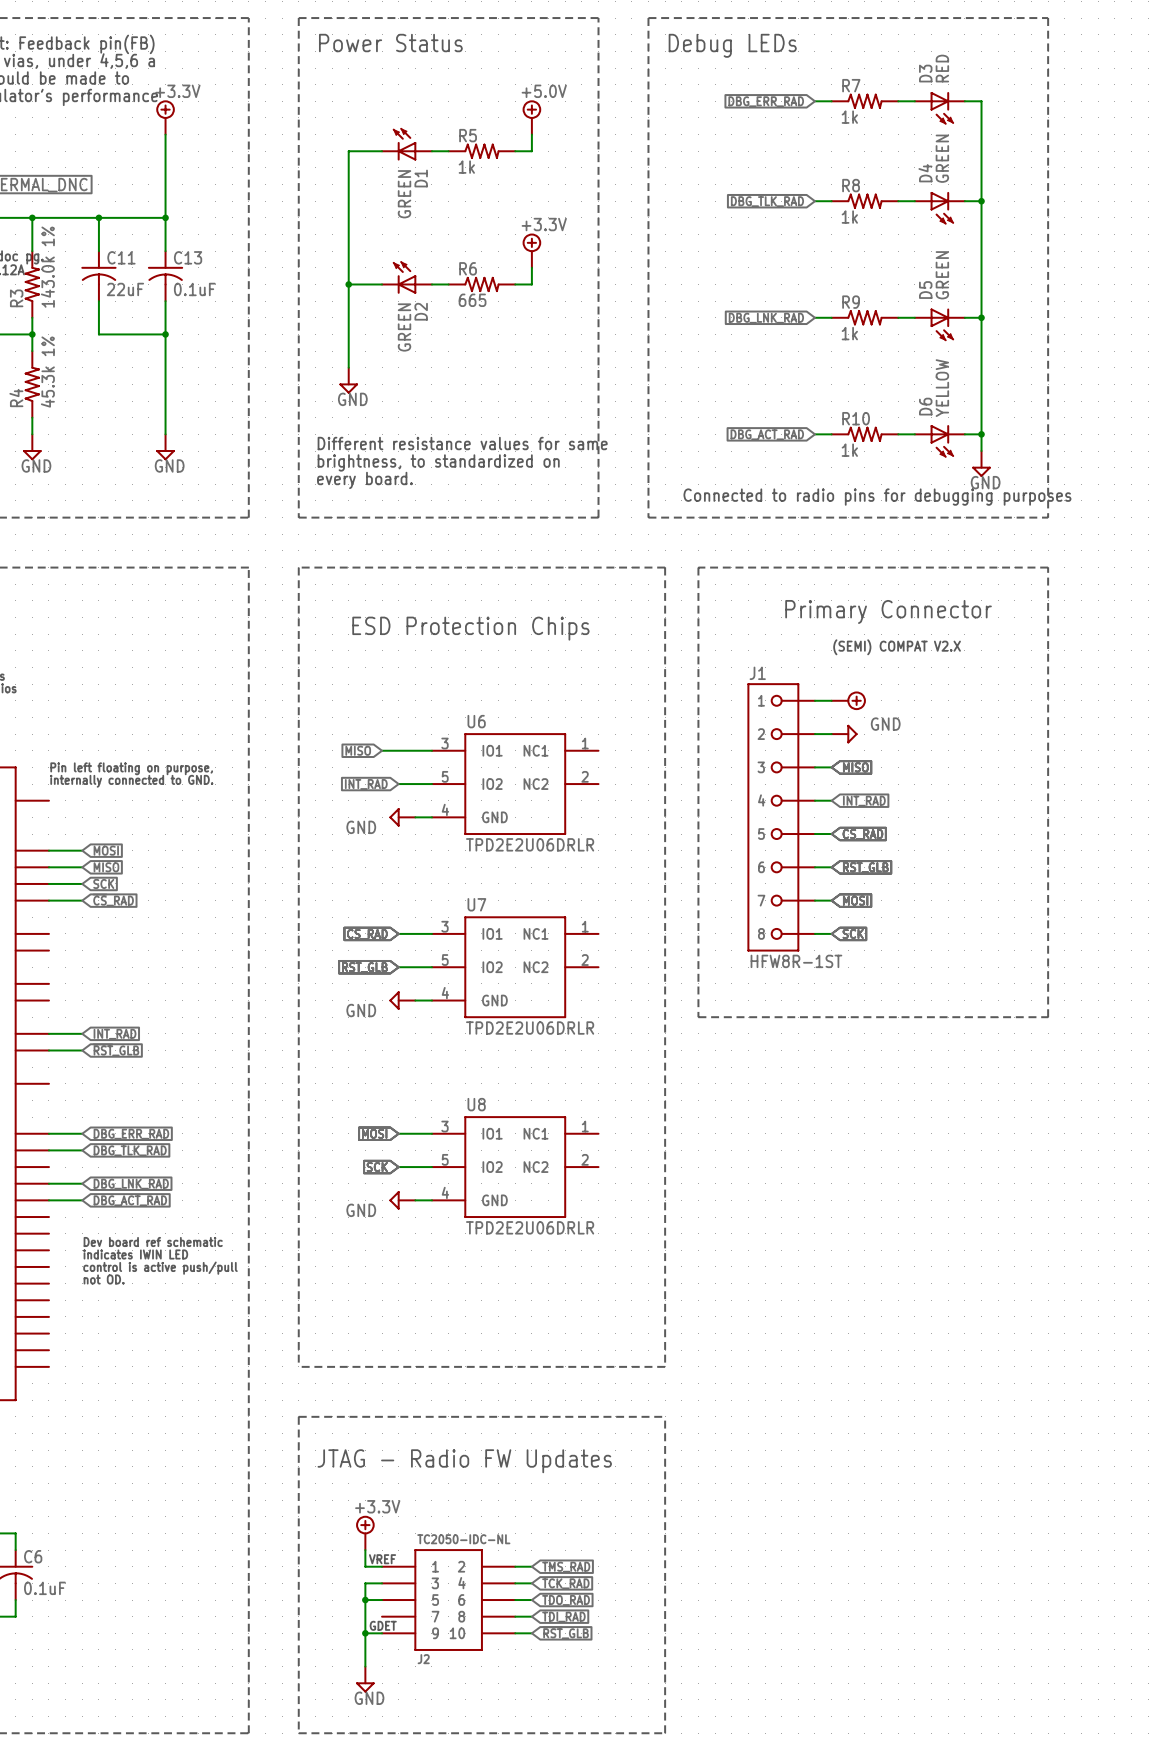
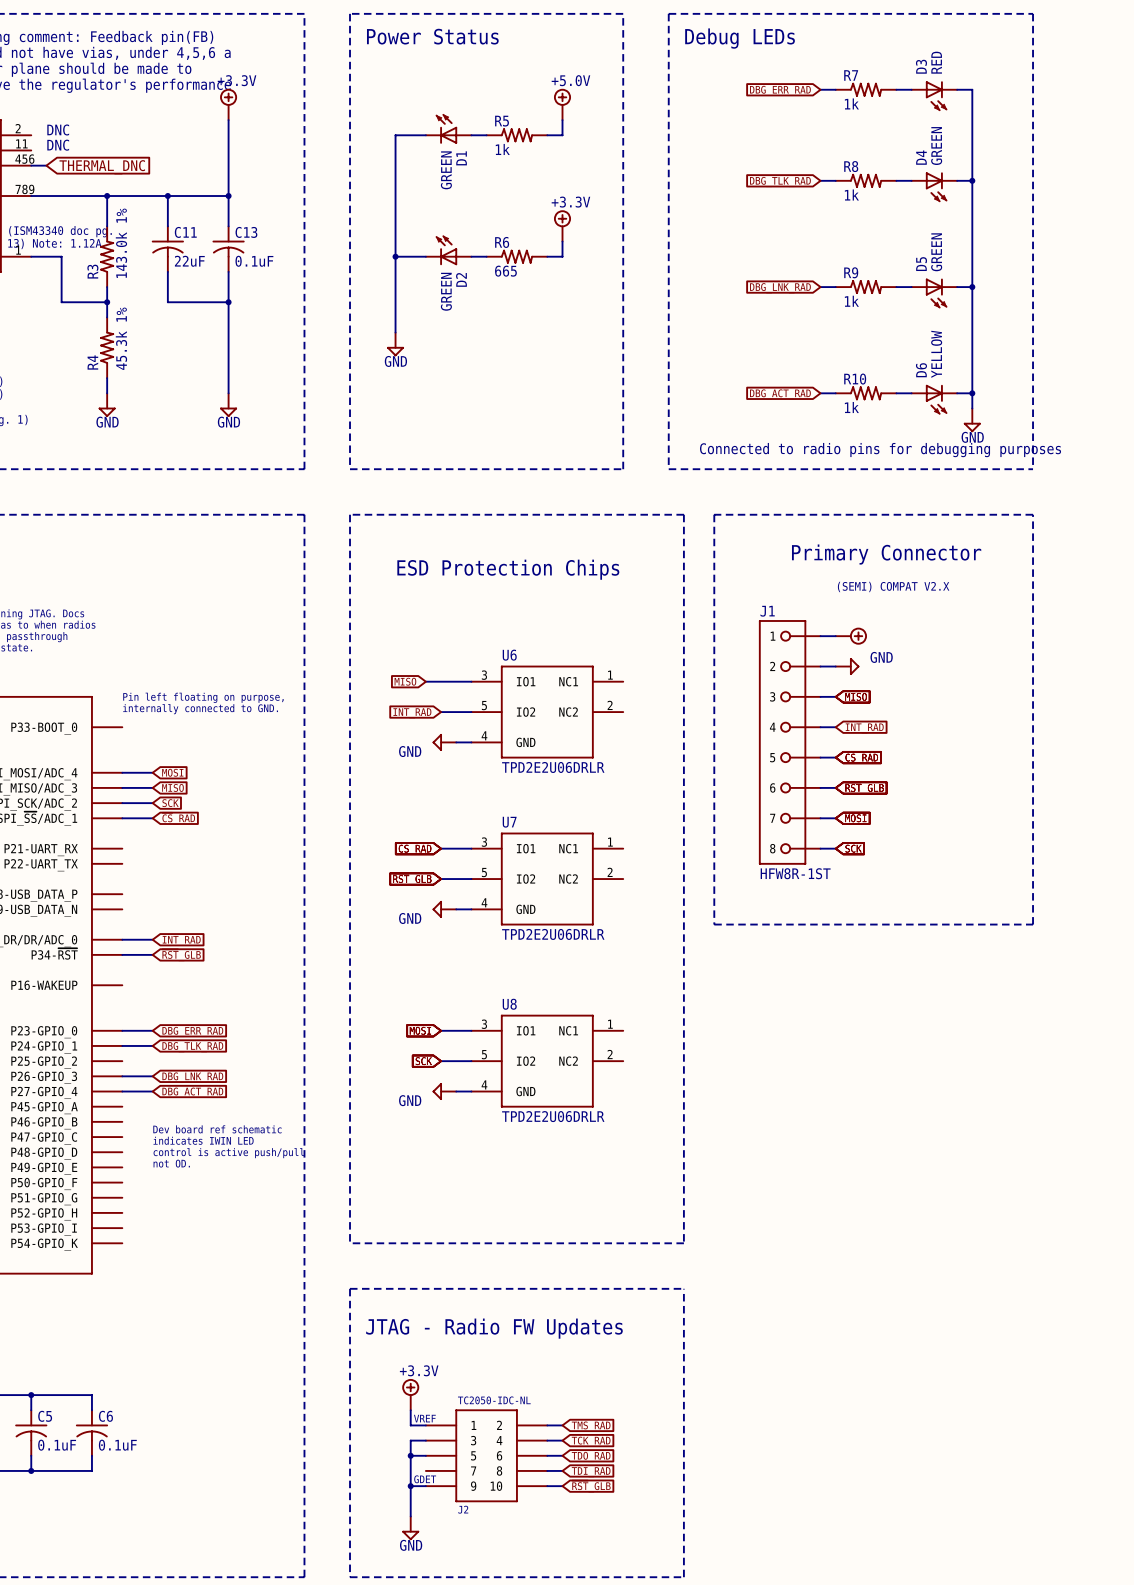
text: Different resistance values for same (462, 443) -> none
text: brightness, to standardized on (438, 462) -> none
text: every board. (364, 480) -> none

